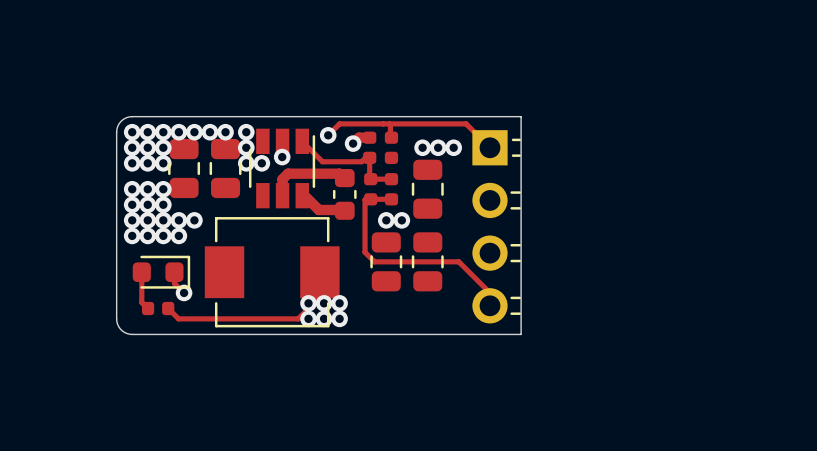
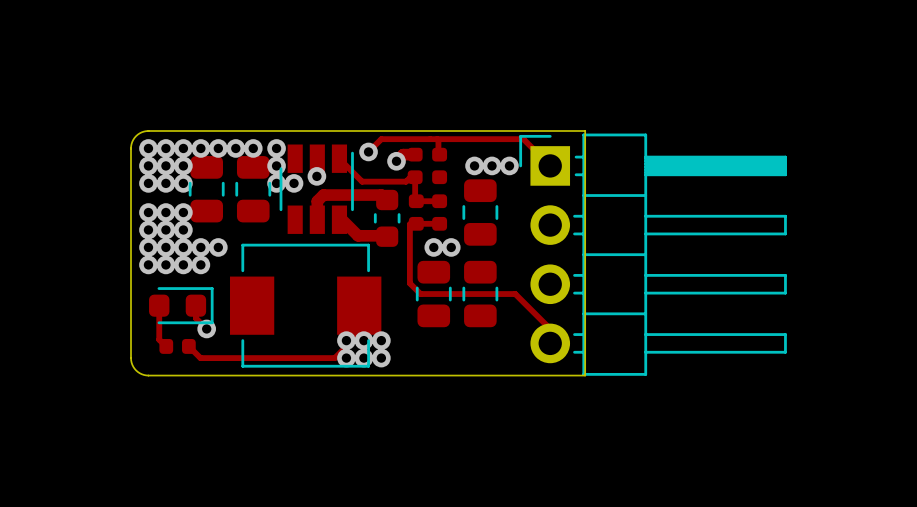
part: (496, 226) -> none
part: none -> (653, 254)

